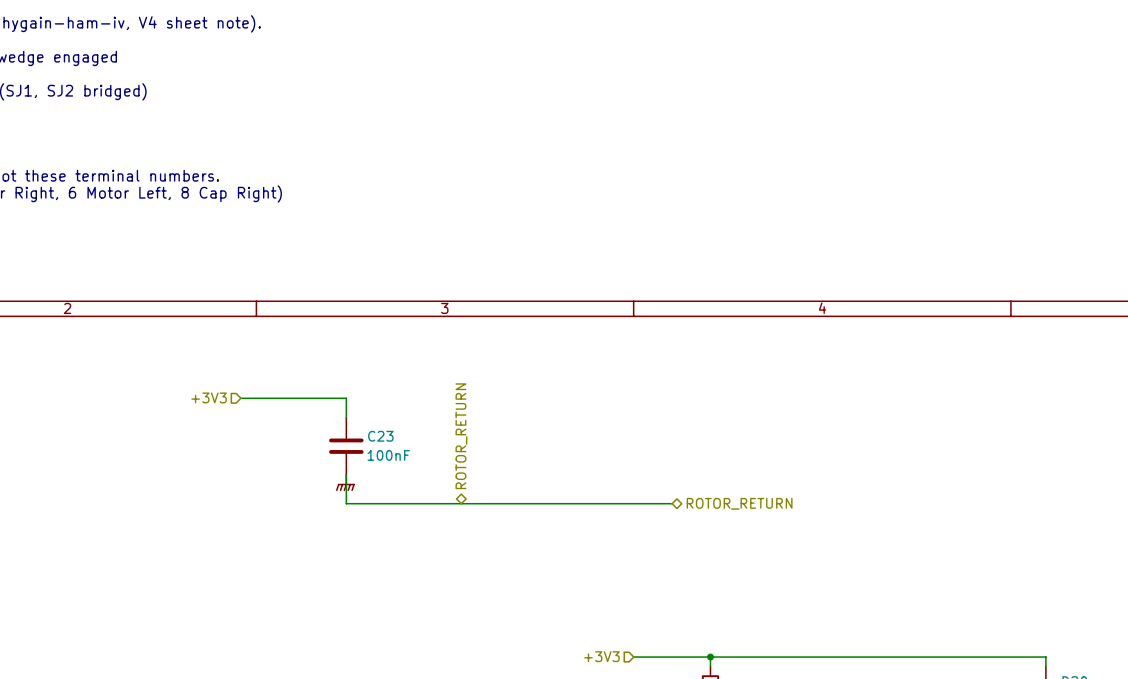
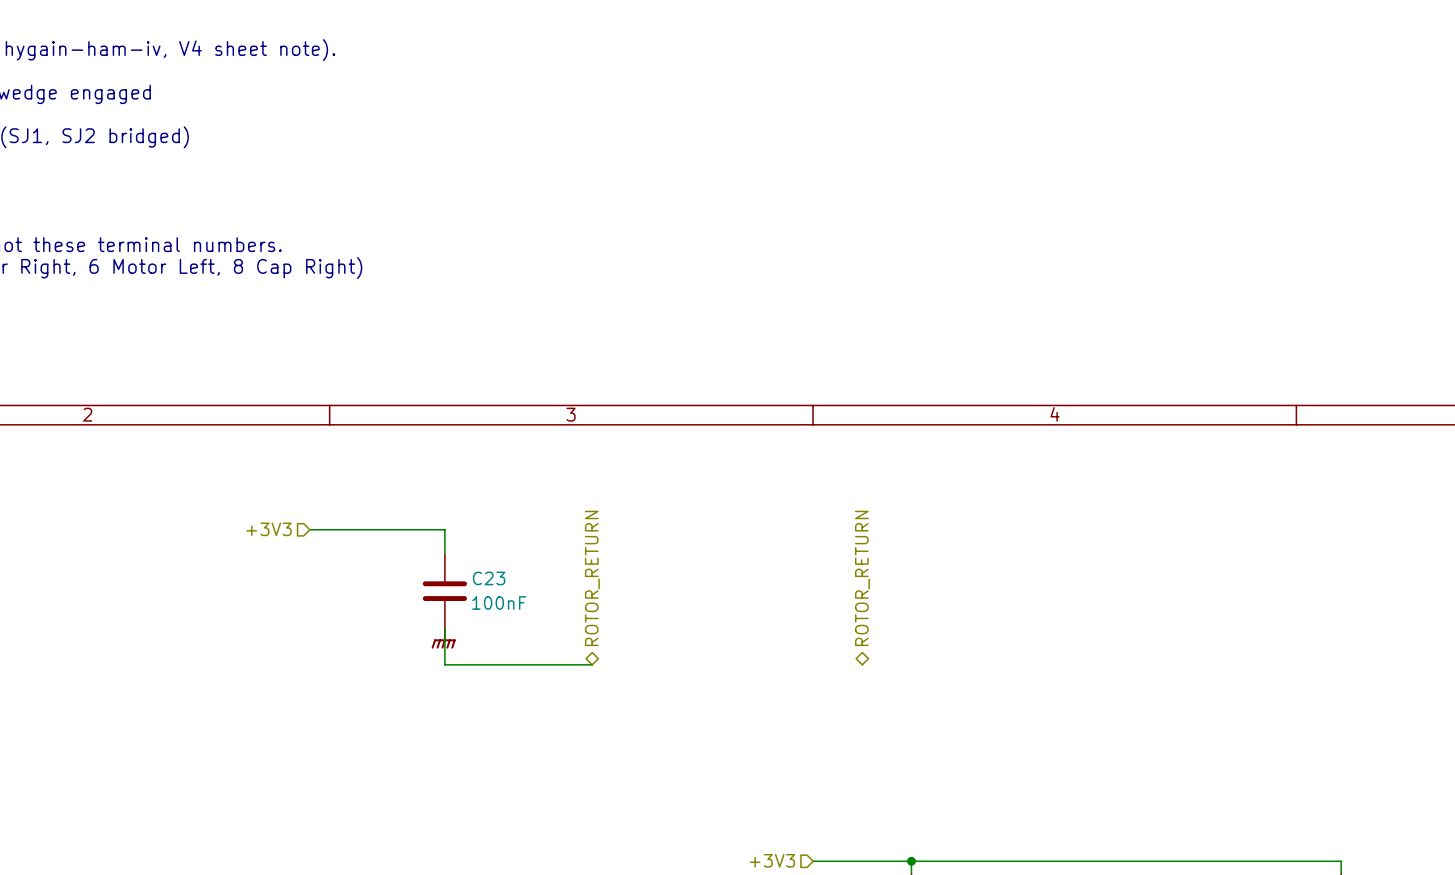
wire: (461, 503) (672, 503) -> none
hierarchical label rotation: 0° (739, 503) -> 90° counterclockwise (862, 578)

